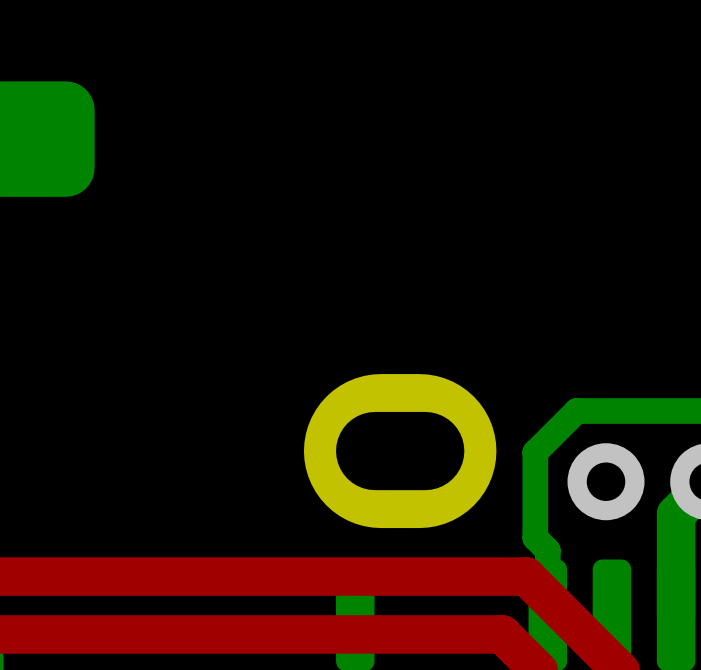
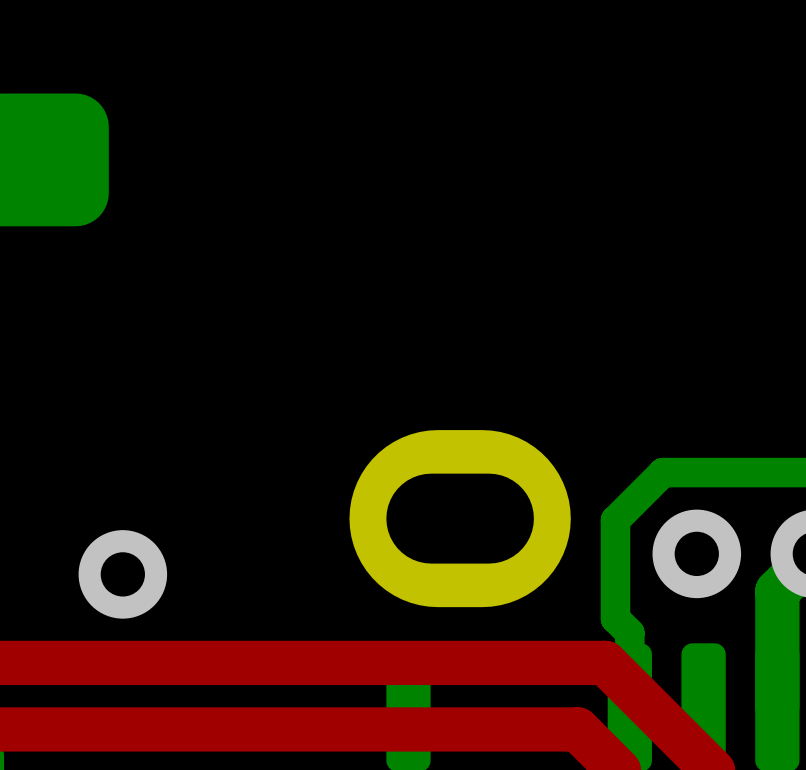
via: none -> (122, 574)

